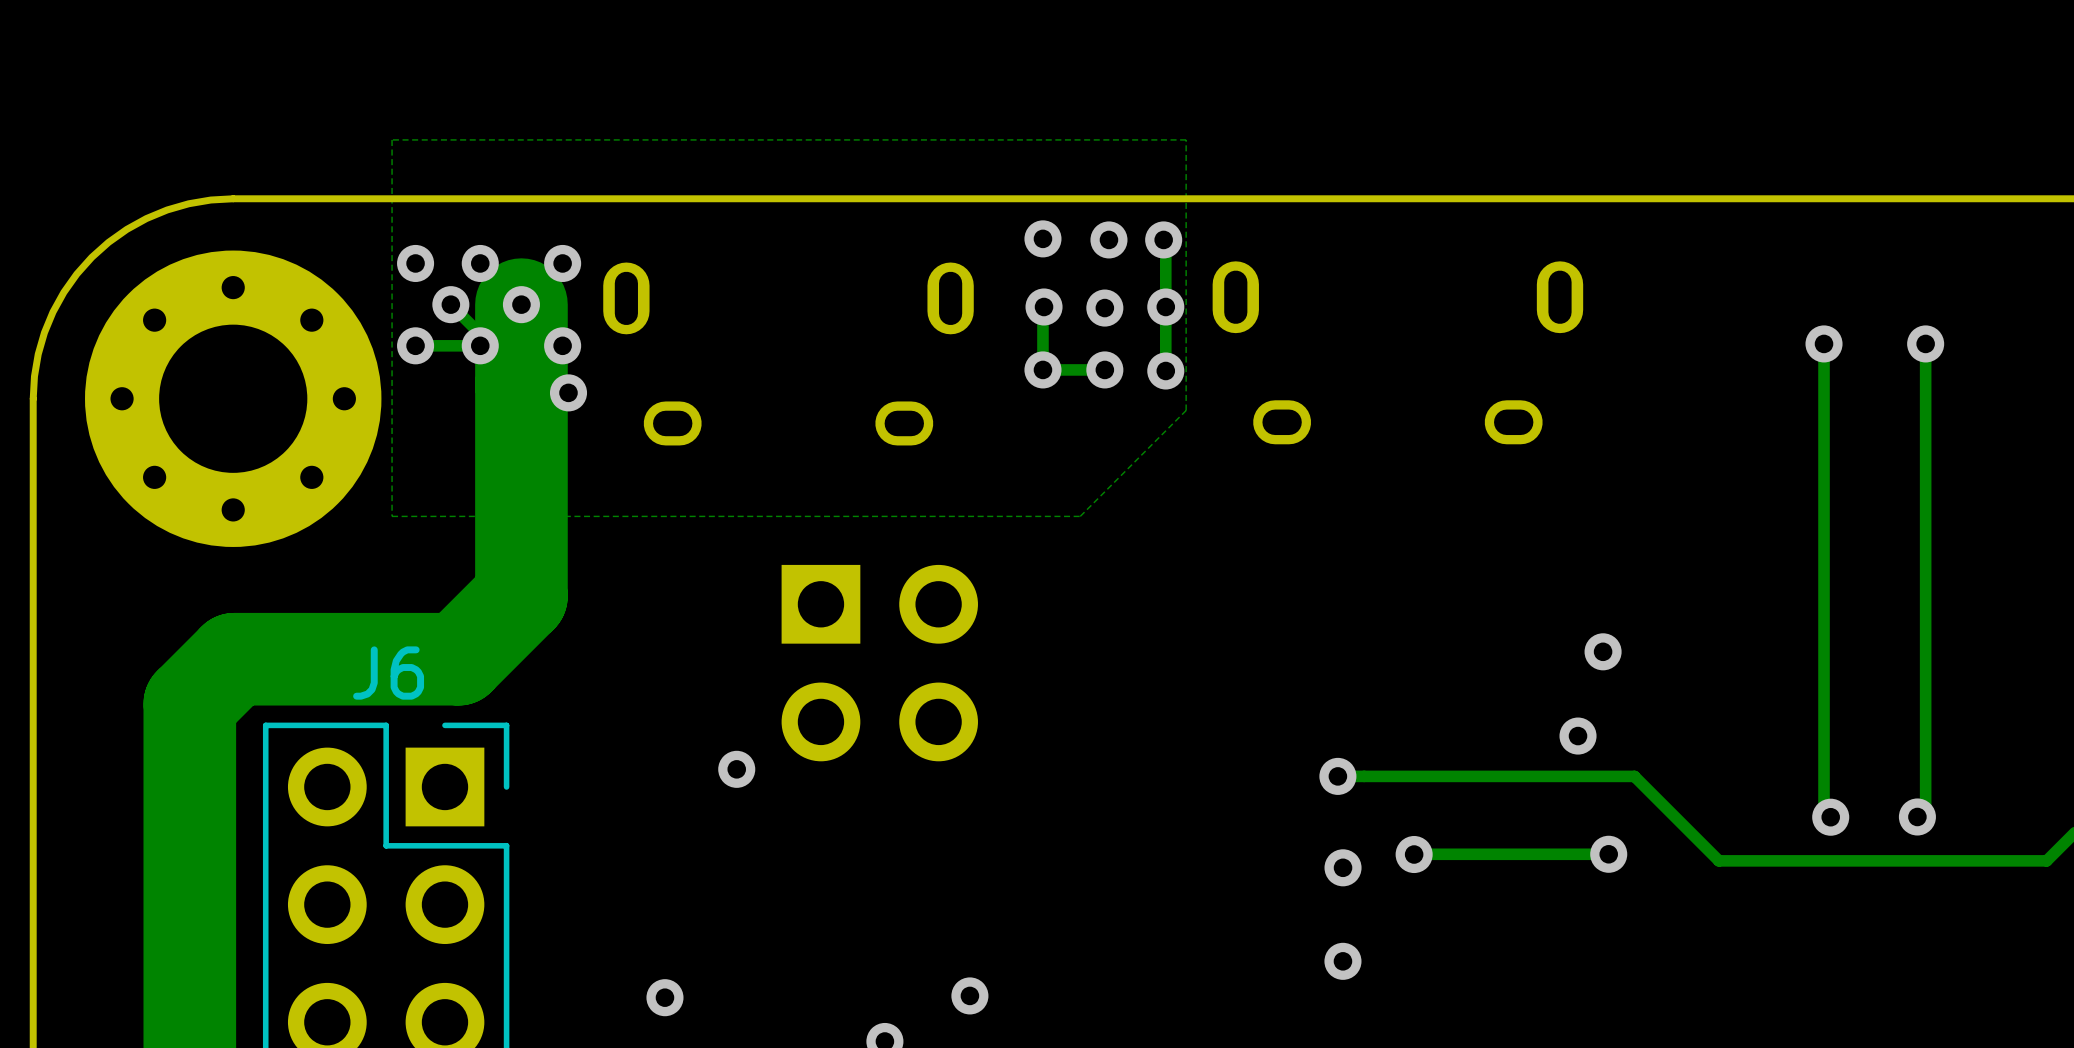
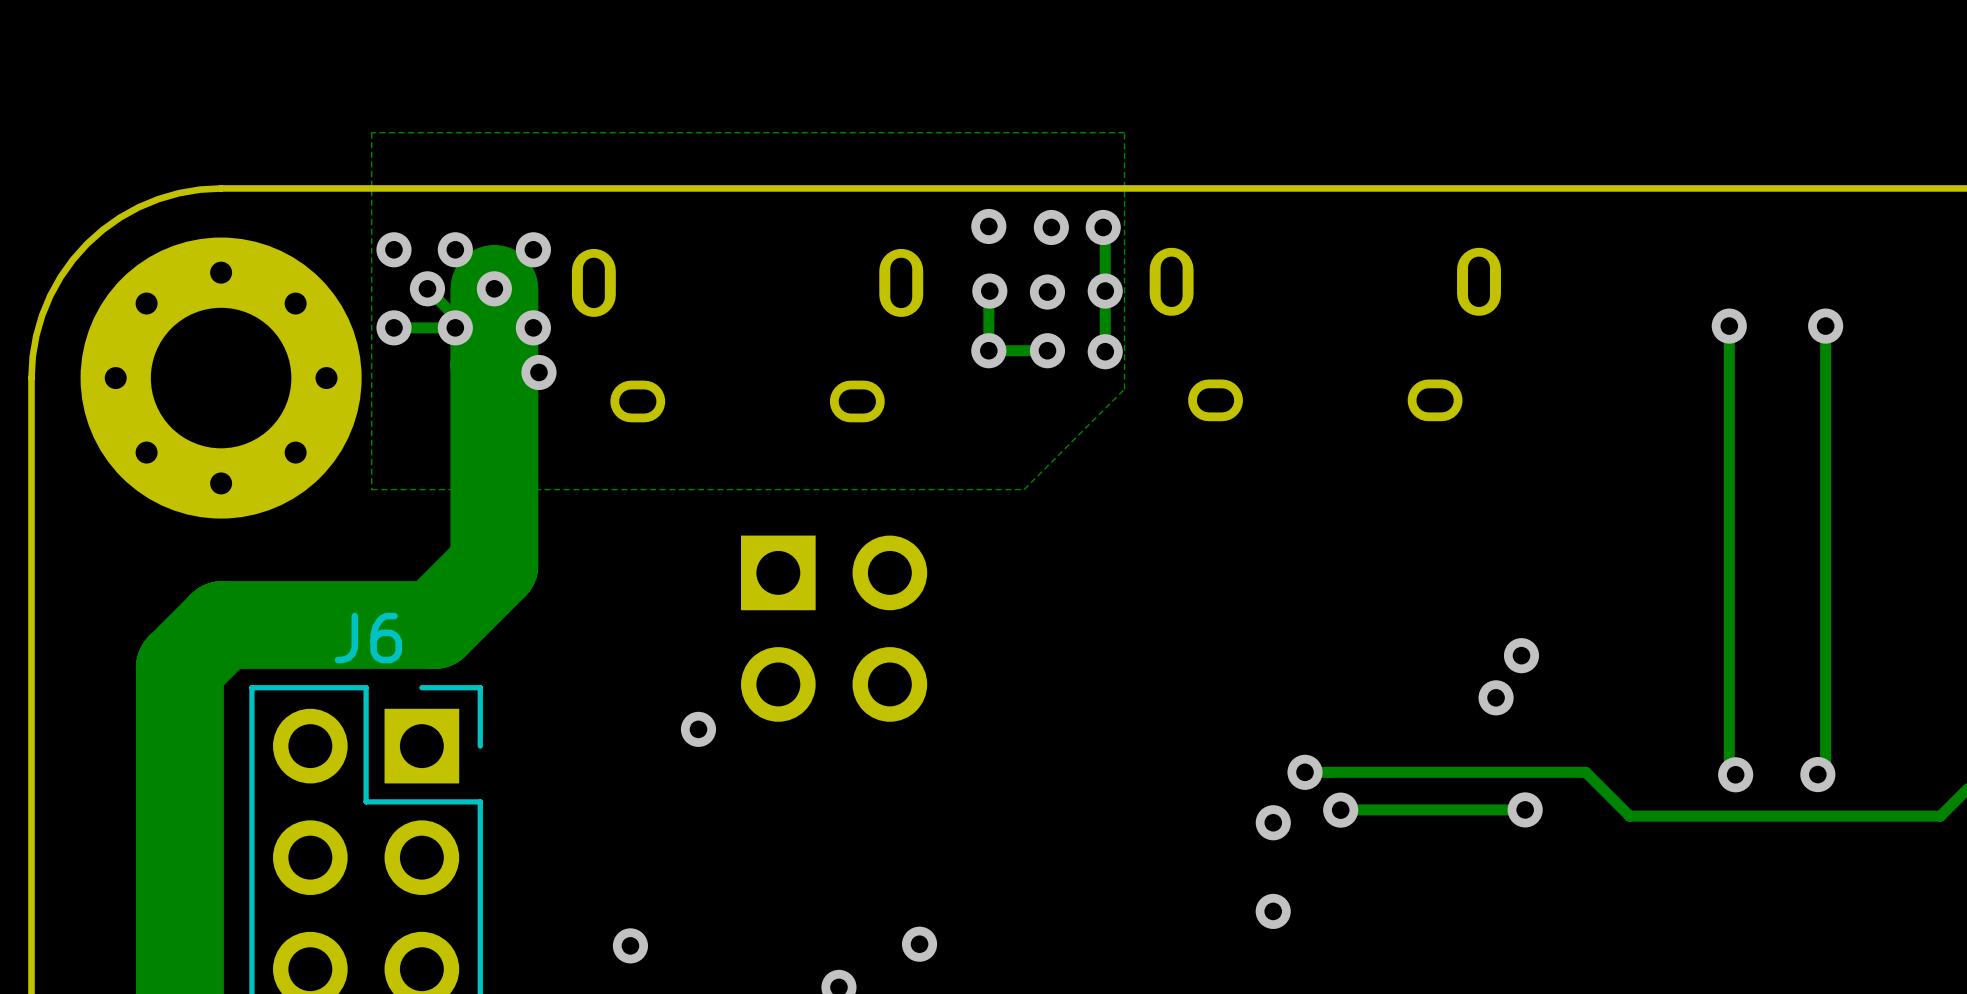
via position: (1603, 651) -> (1521, 655)
track: (1337, 776) (1634, 776) (1672, 814) -> (1305, 772) (1585, 772)
via position: (1337, 776) -> (1305, 772)

